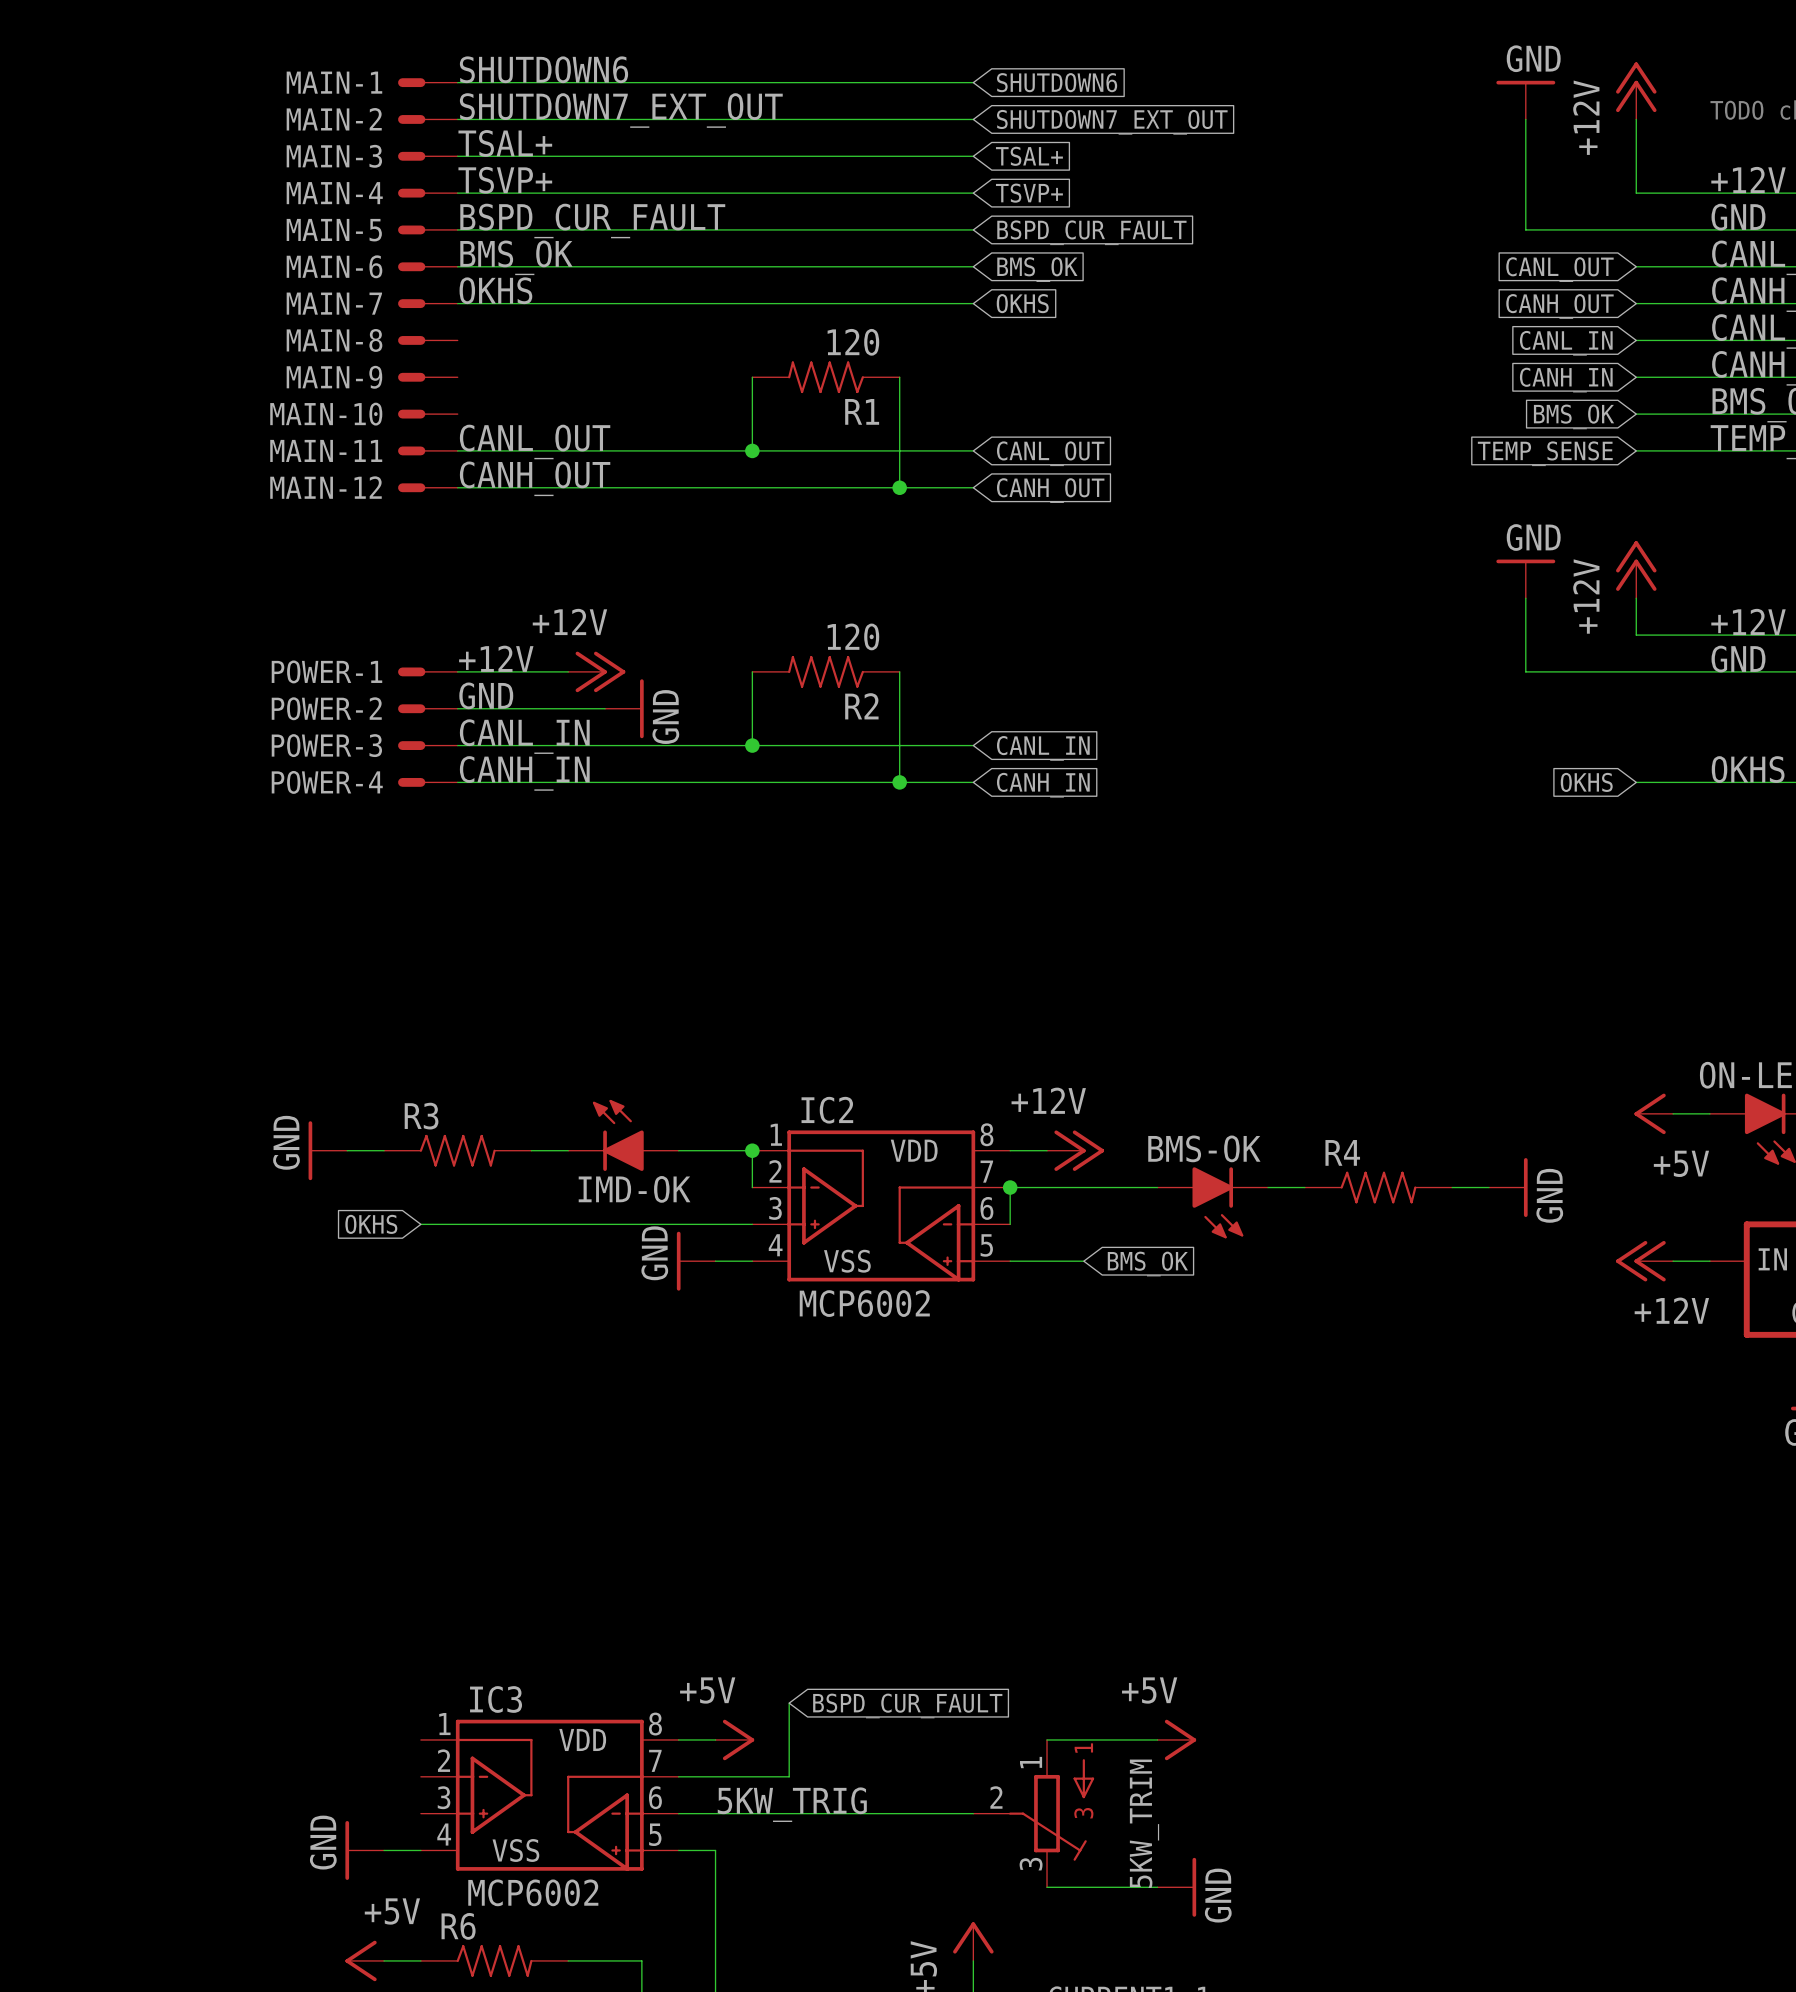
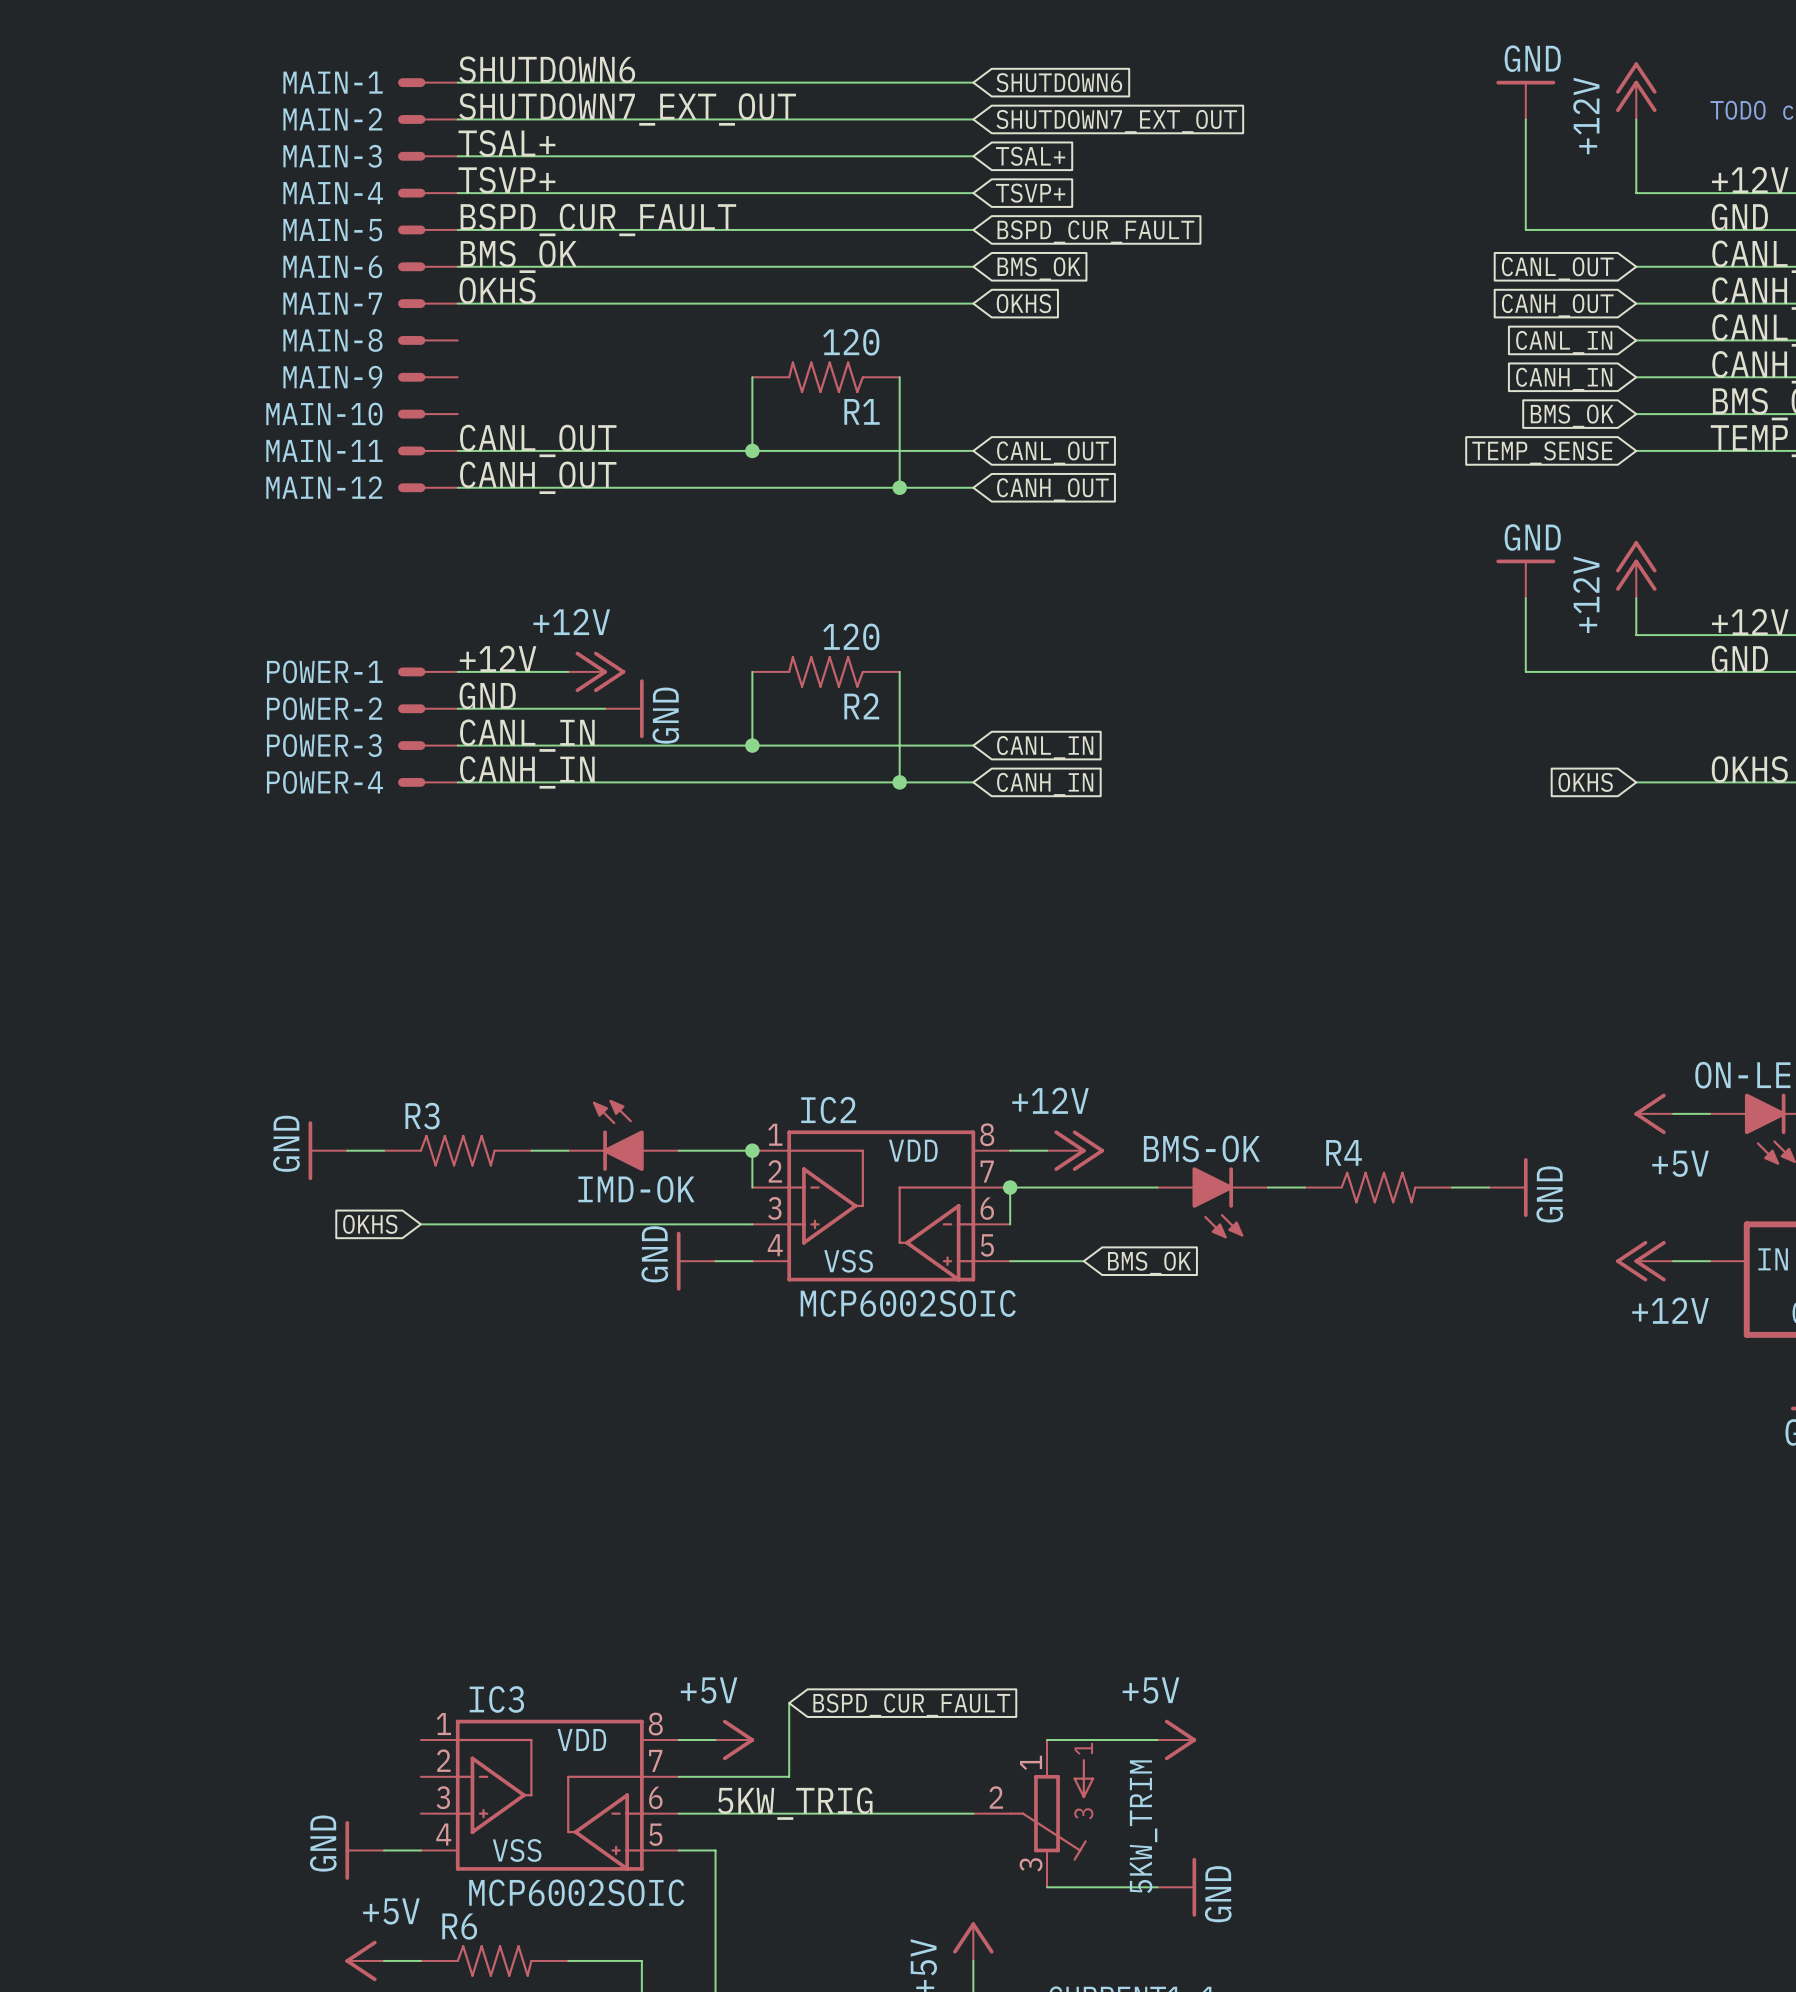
IC2 value: MCP6002 (864, 1303) -> MCP6002SOIC (908, 1303)
IC3 value: MCP6002 (533, 1892) -> MCP6002SOIC (576, 1892)

